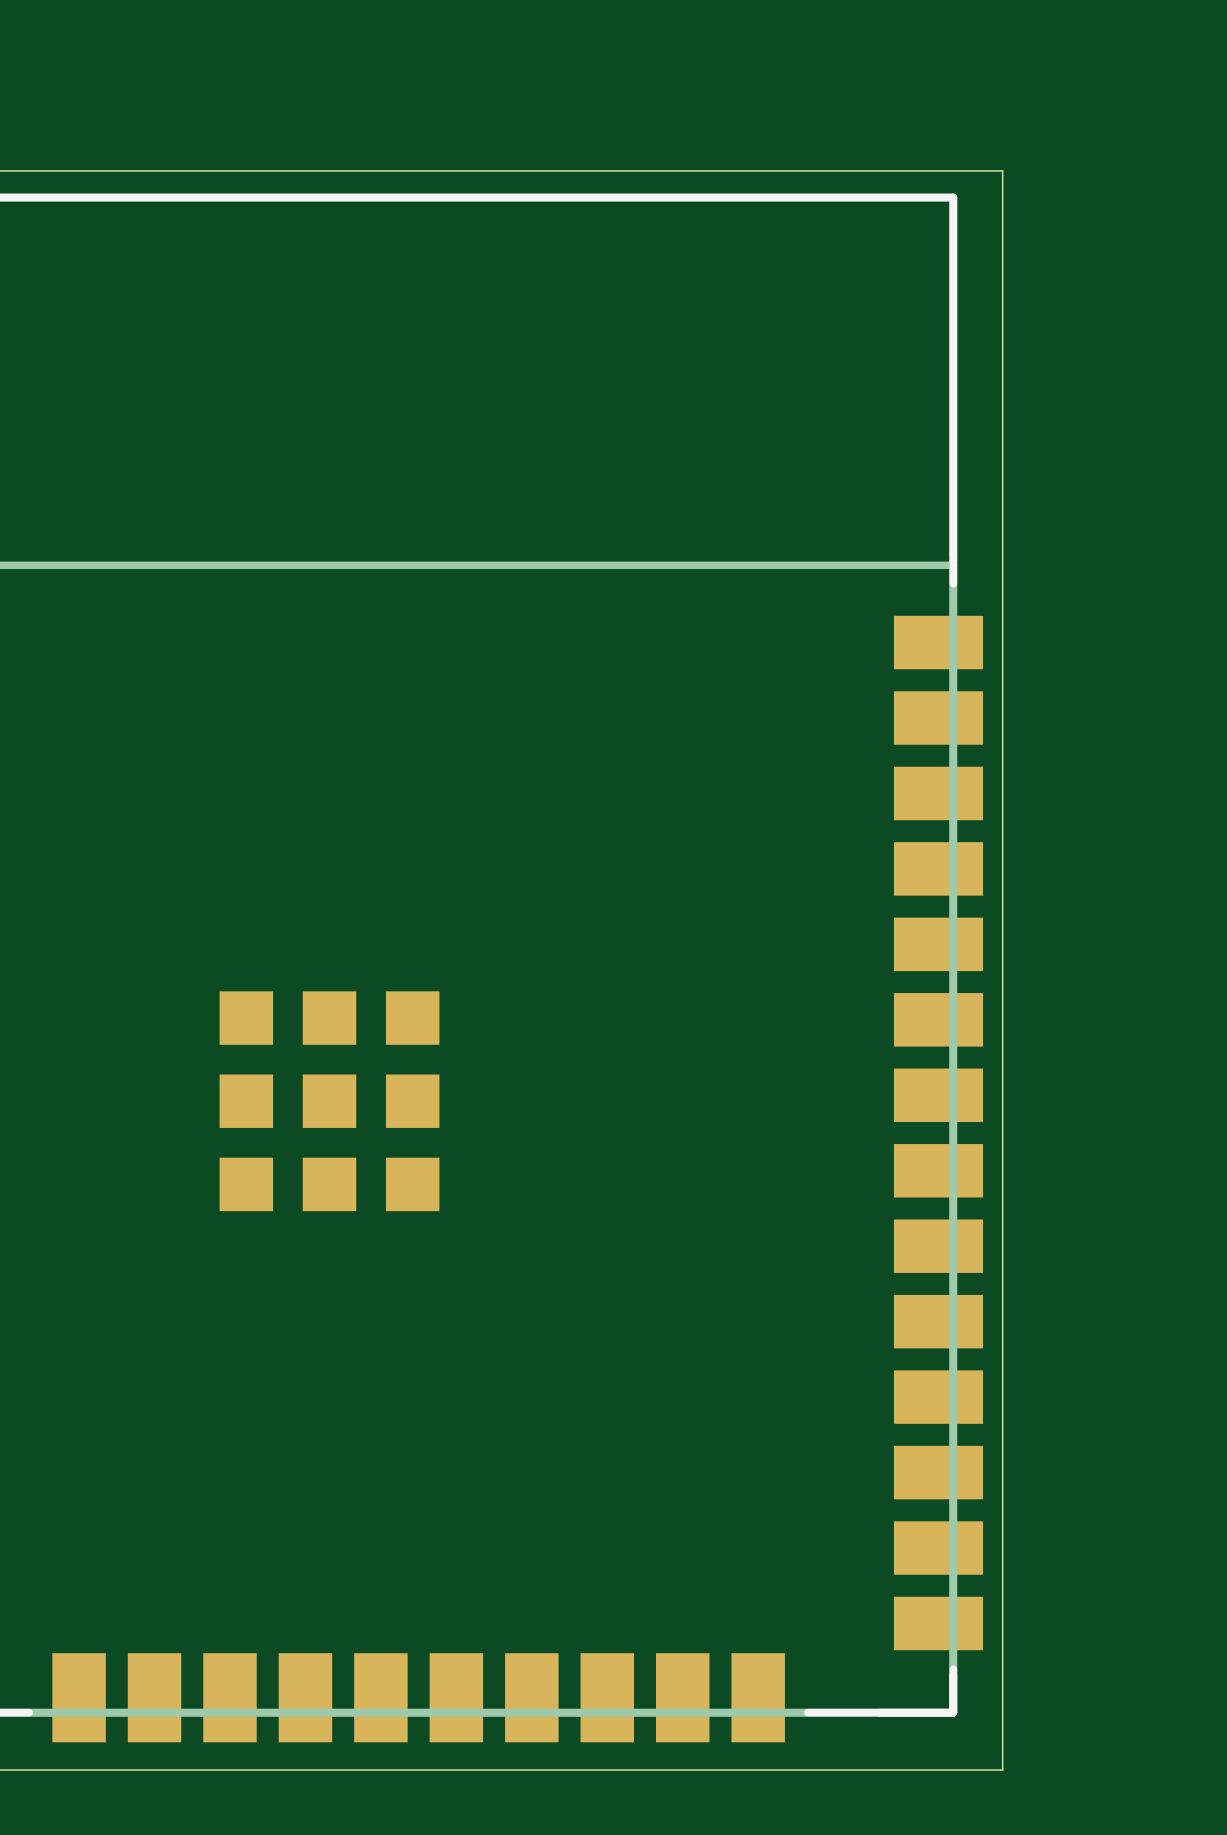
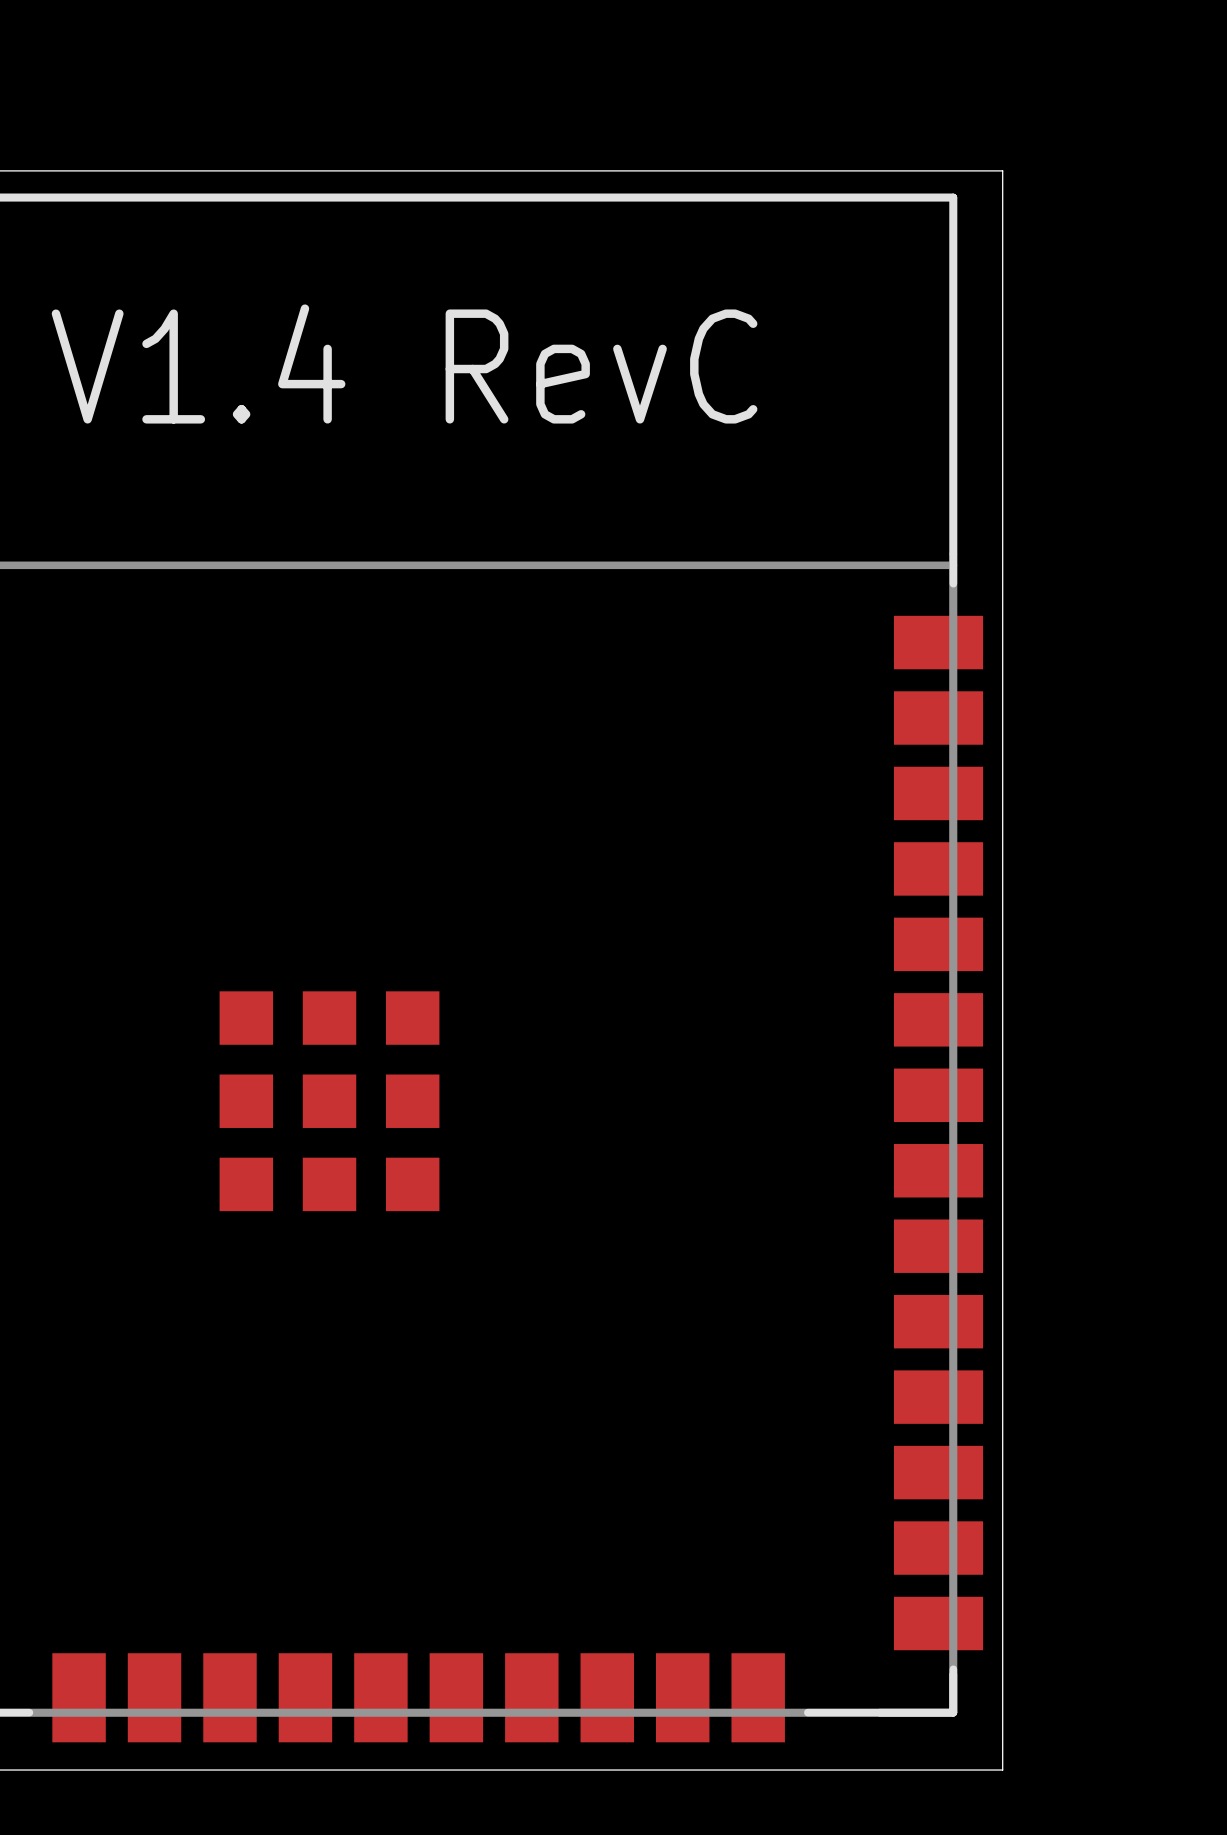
text: none -> V1.4 RevC (404, 363)

